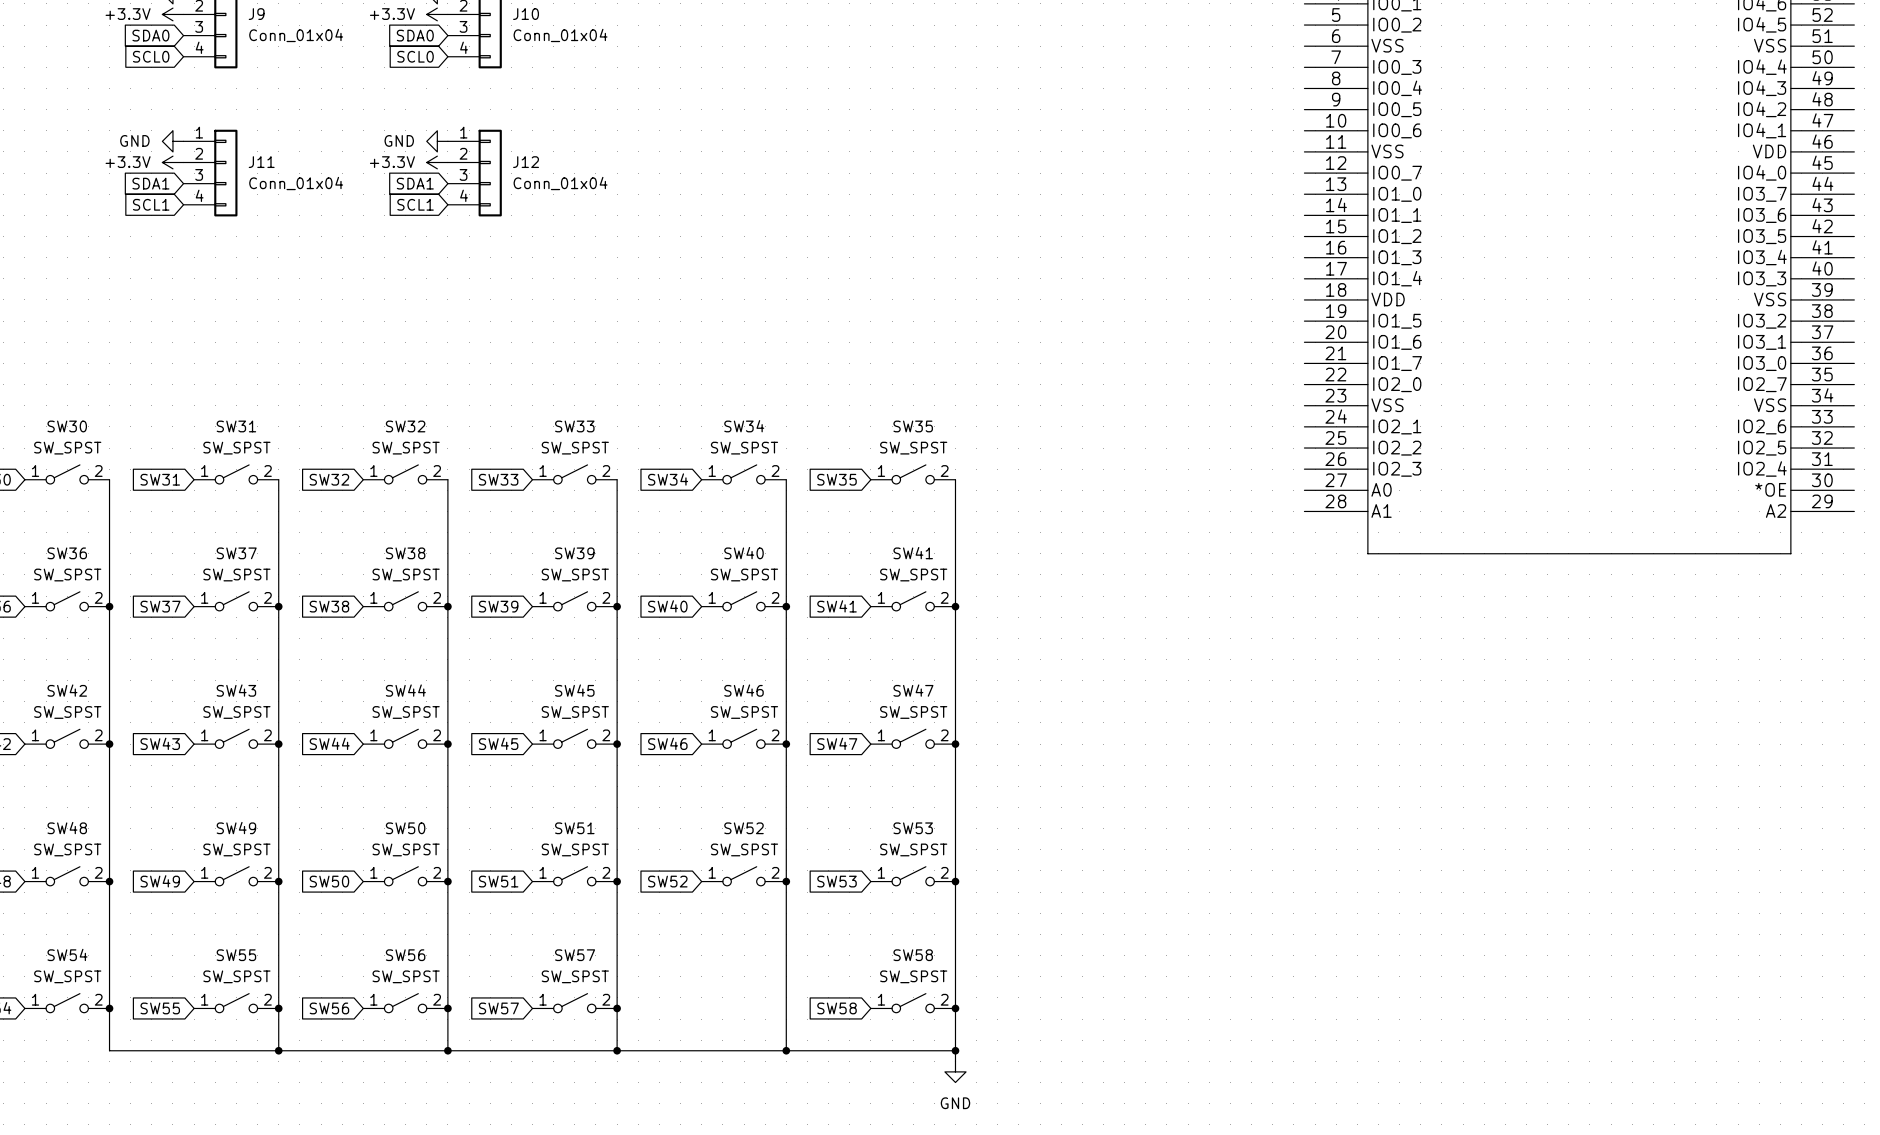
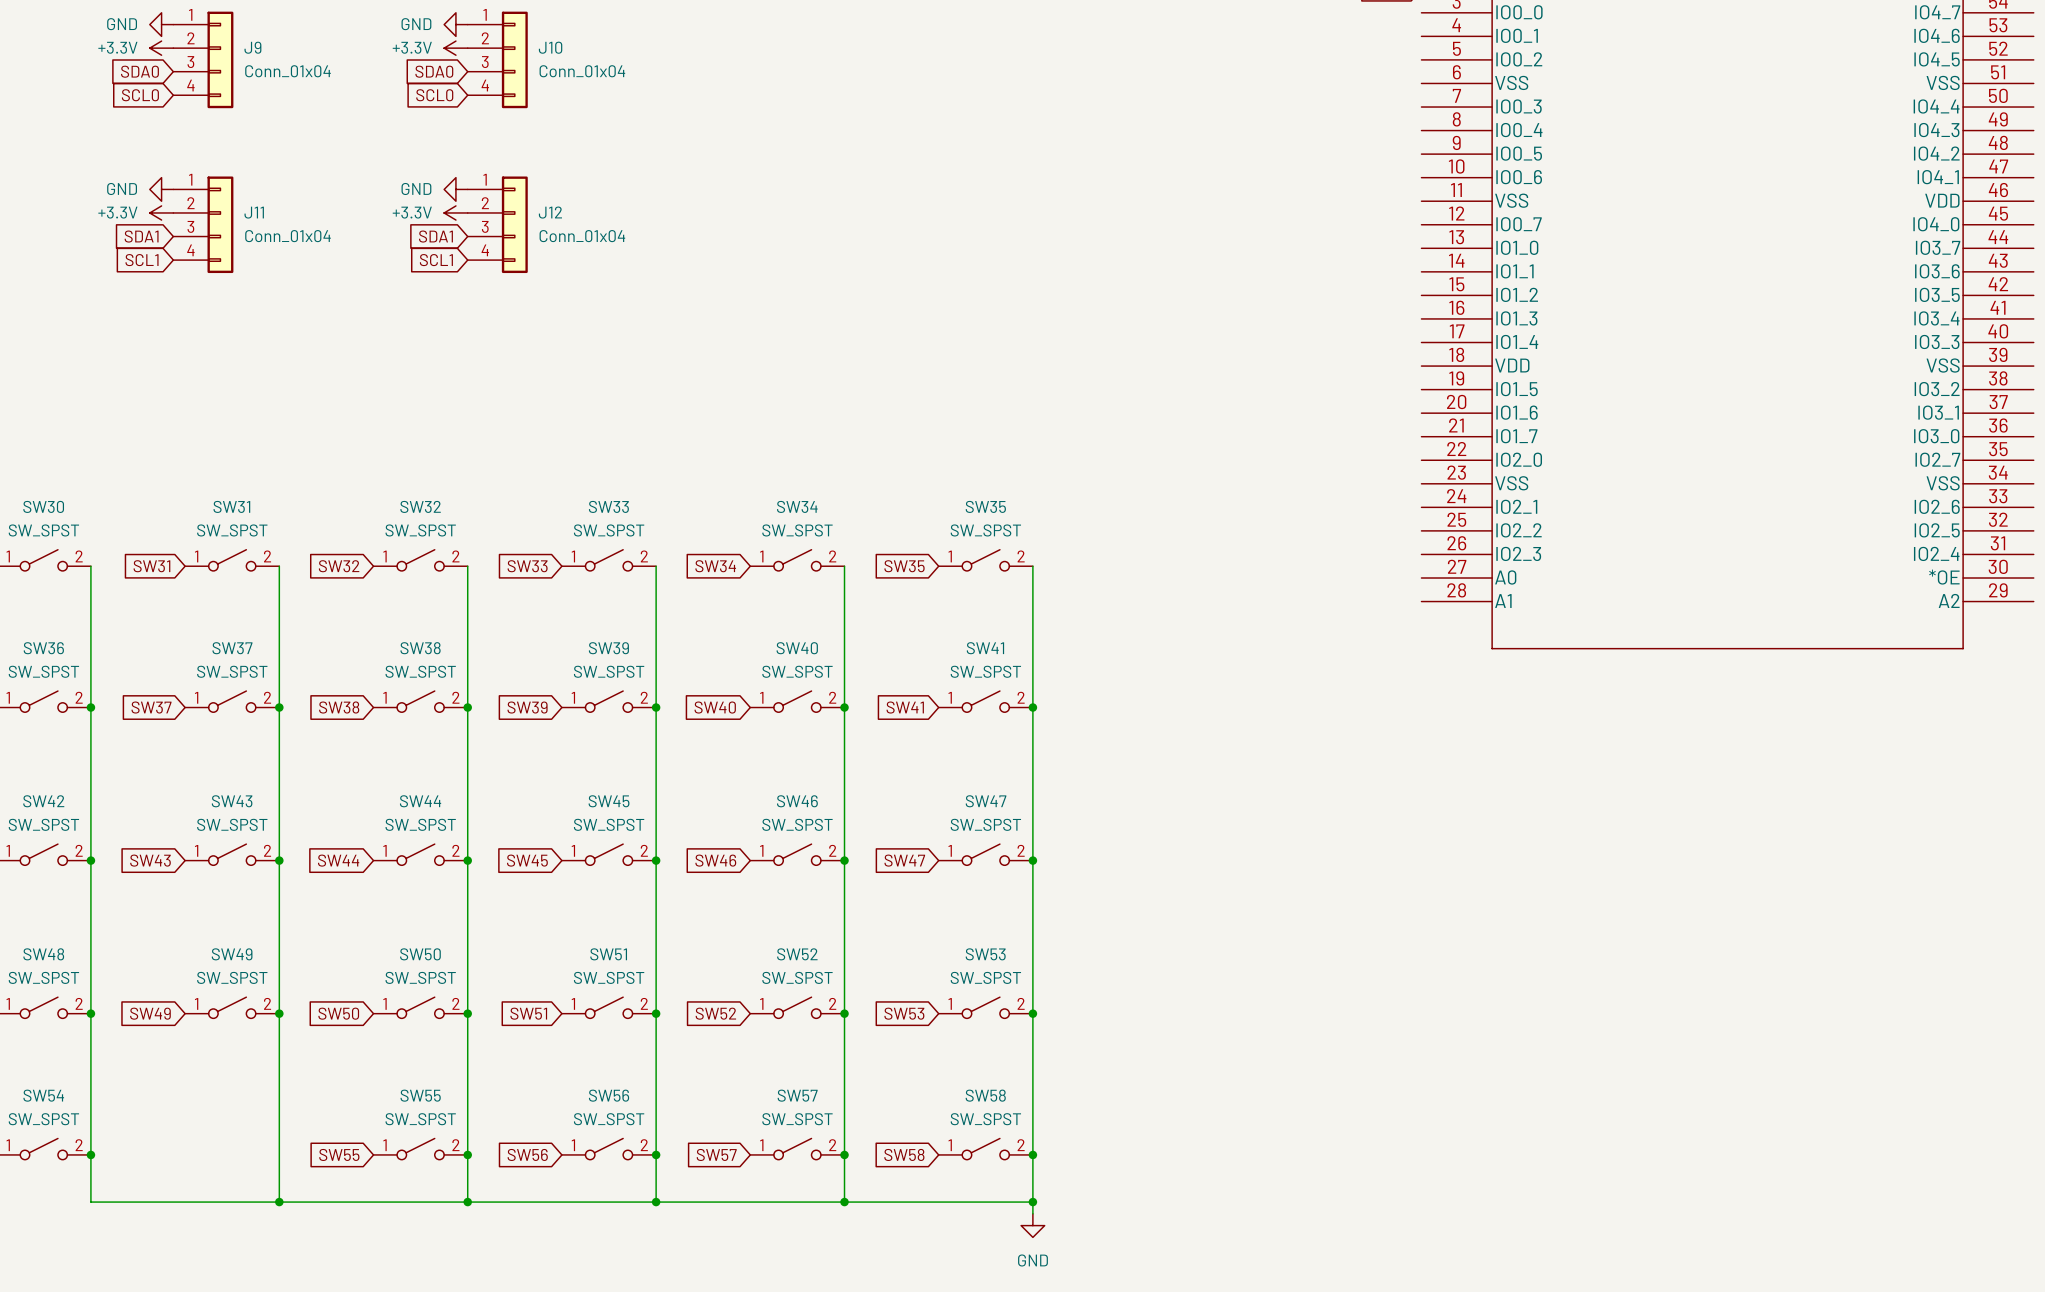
SW56 name: SW56 (405, 955) -> SW55 (420, 1095)
SW57 name: SW57 (575, 955) -> SW56 (609, 1095)
SW55: SW_SPST (236, 1003) -> none
SW57: none -> SW_SPST (797, 1149)
global label: SW55 (160, 1008) -> none
junction: (278, 1008) -> none
global label: SW56 (329, 1008) -> SW55 (339, 1154)
global label: SW57 (498, 1008) -> SW56 (527, 1154)
global label: none -> SW57 (716, 1154)
junction: none -> (844, 1154)

